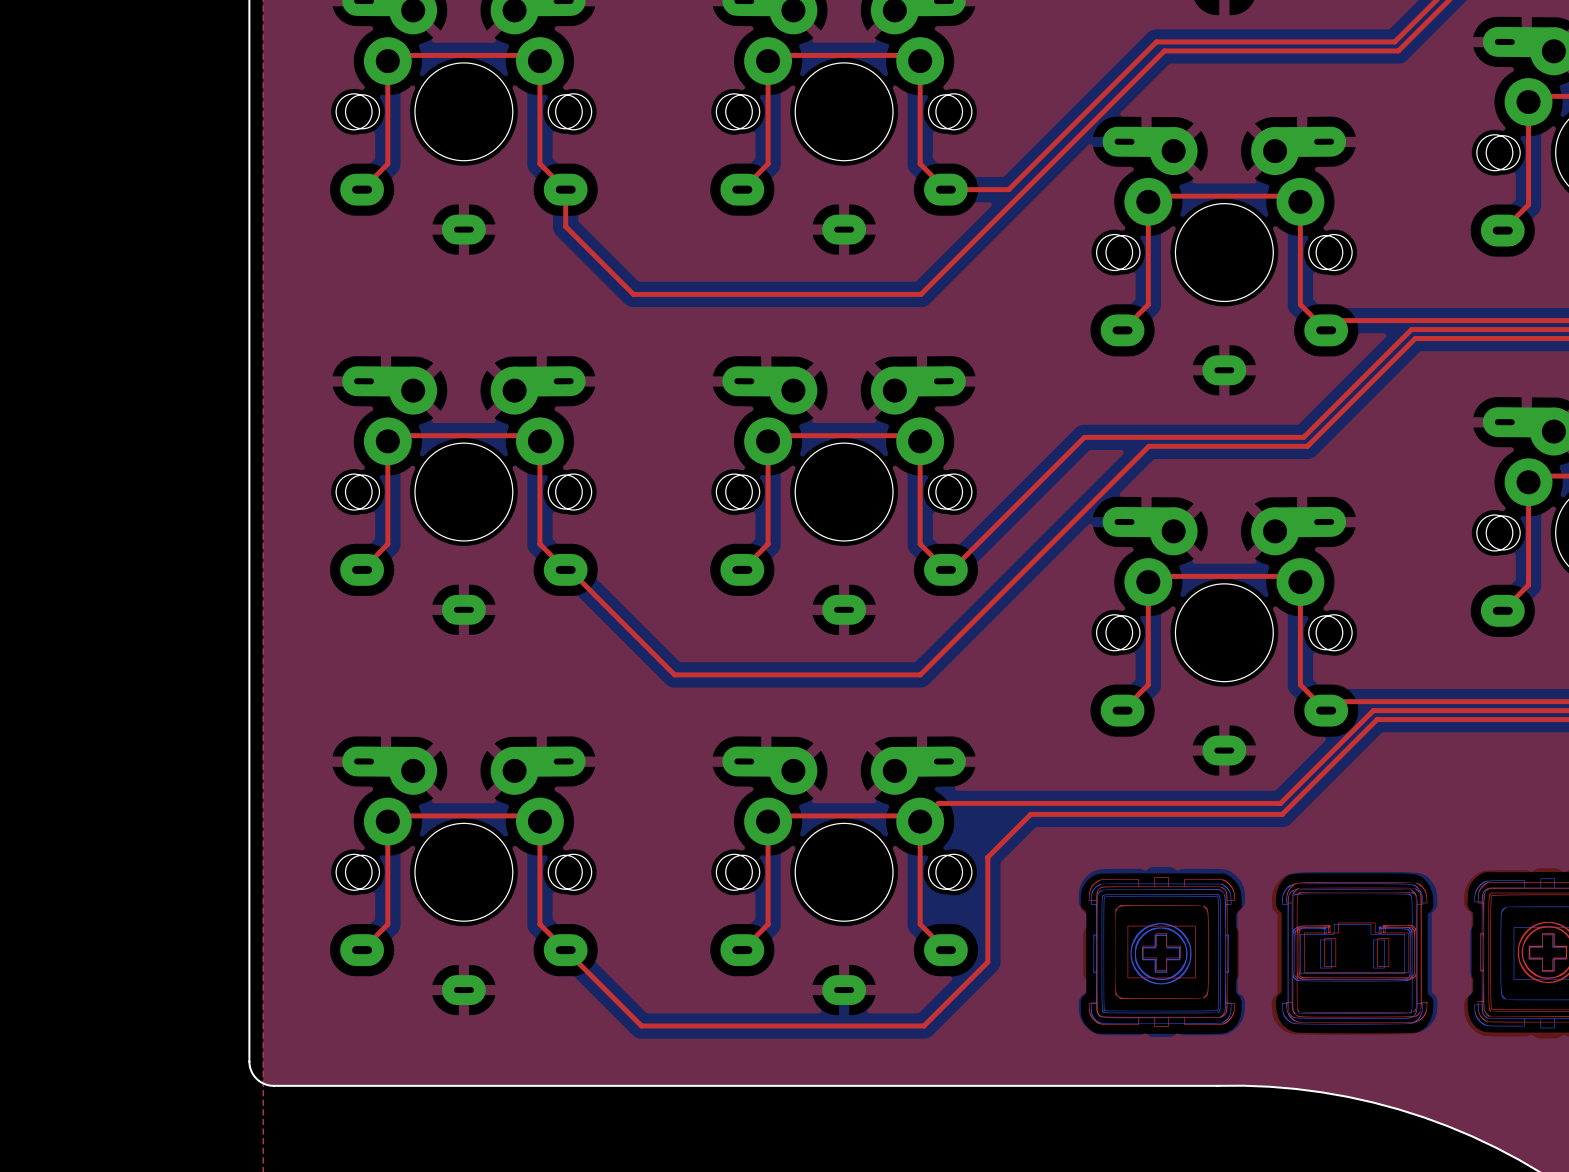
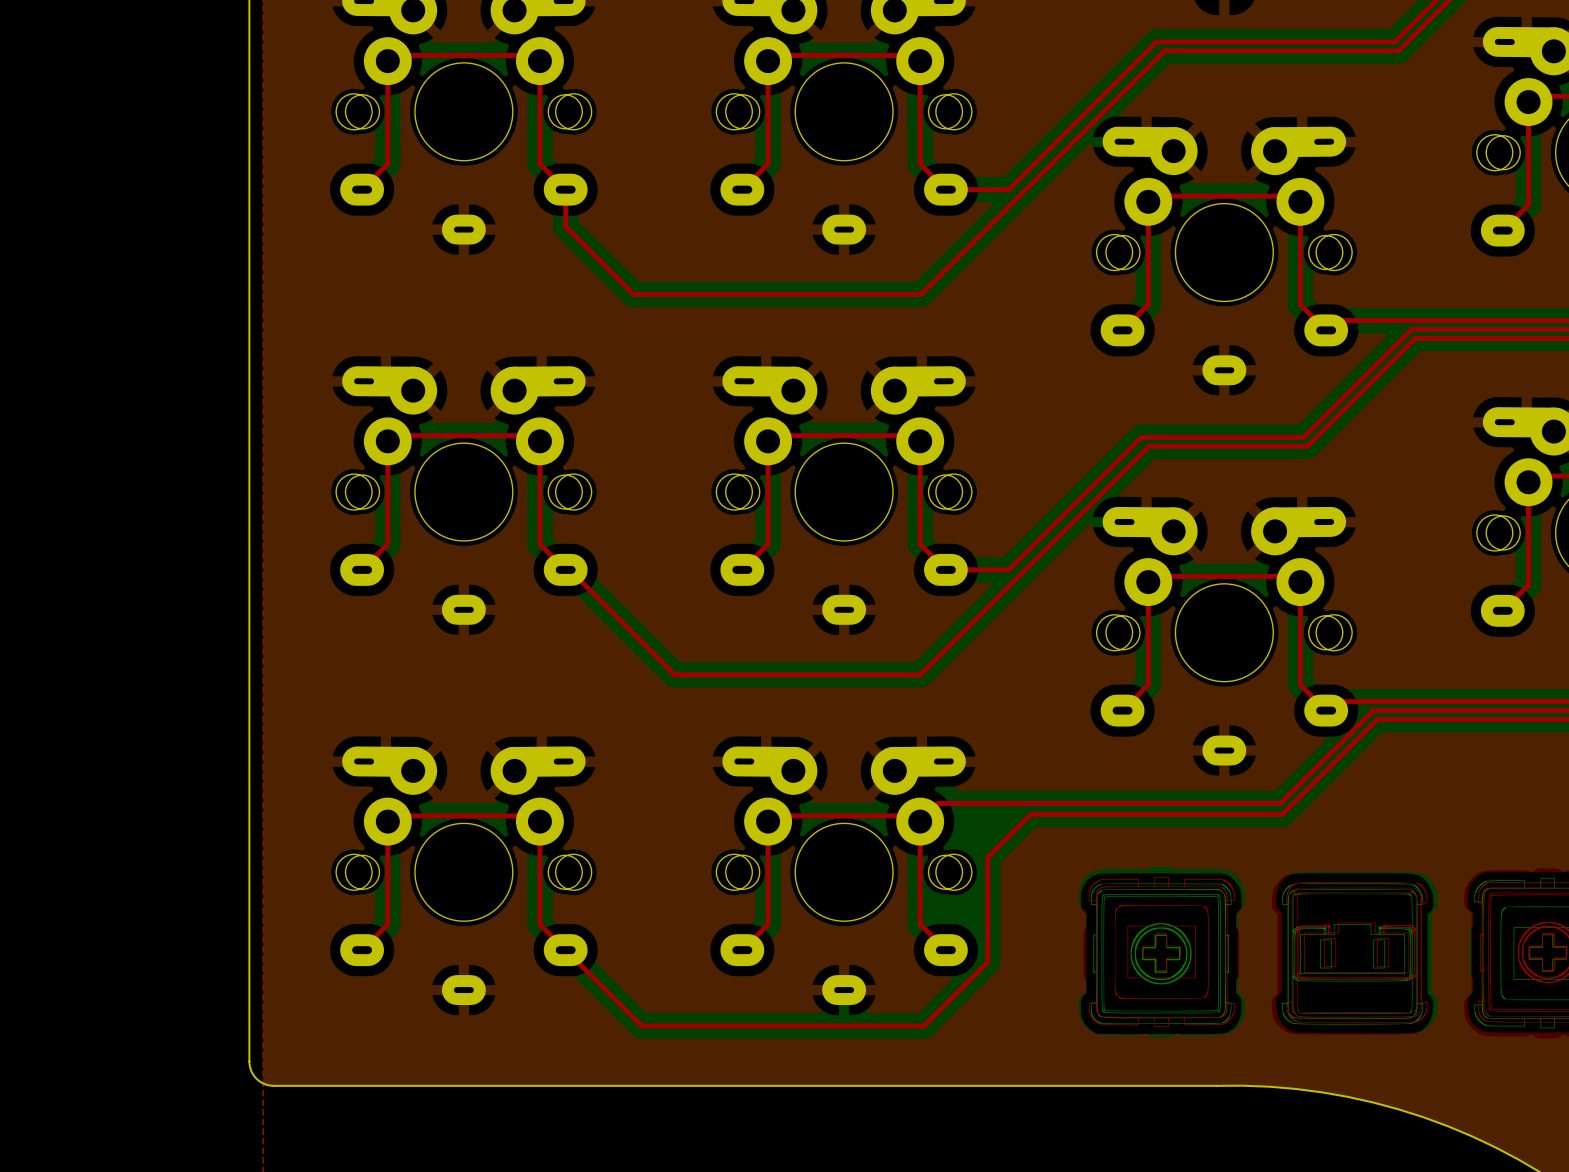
top track: (1141, 437) (1084, 437) (951, 569) -> (1141, 437) (1008, 569) (951, 569)

